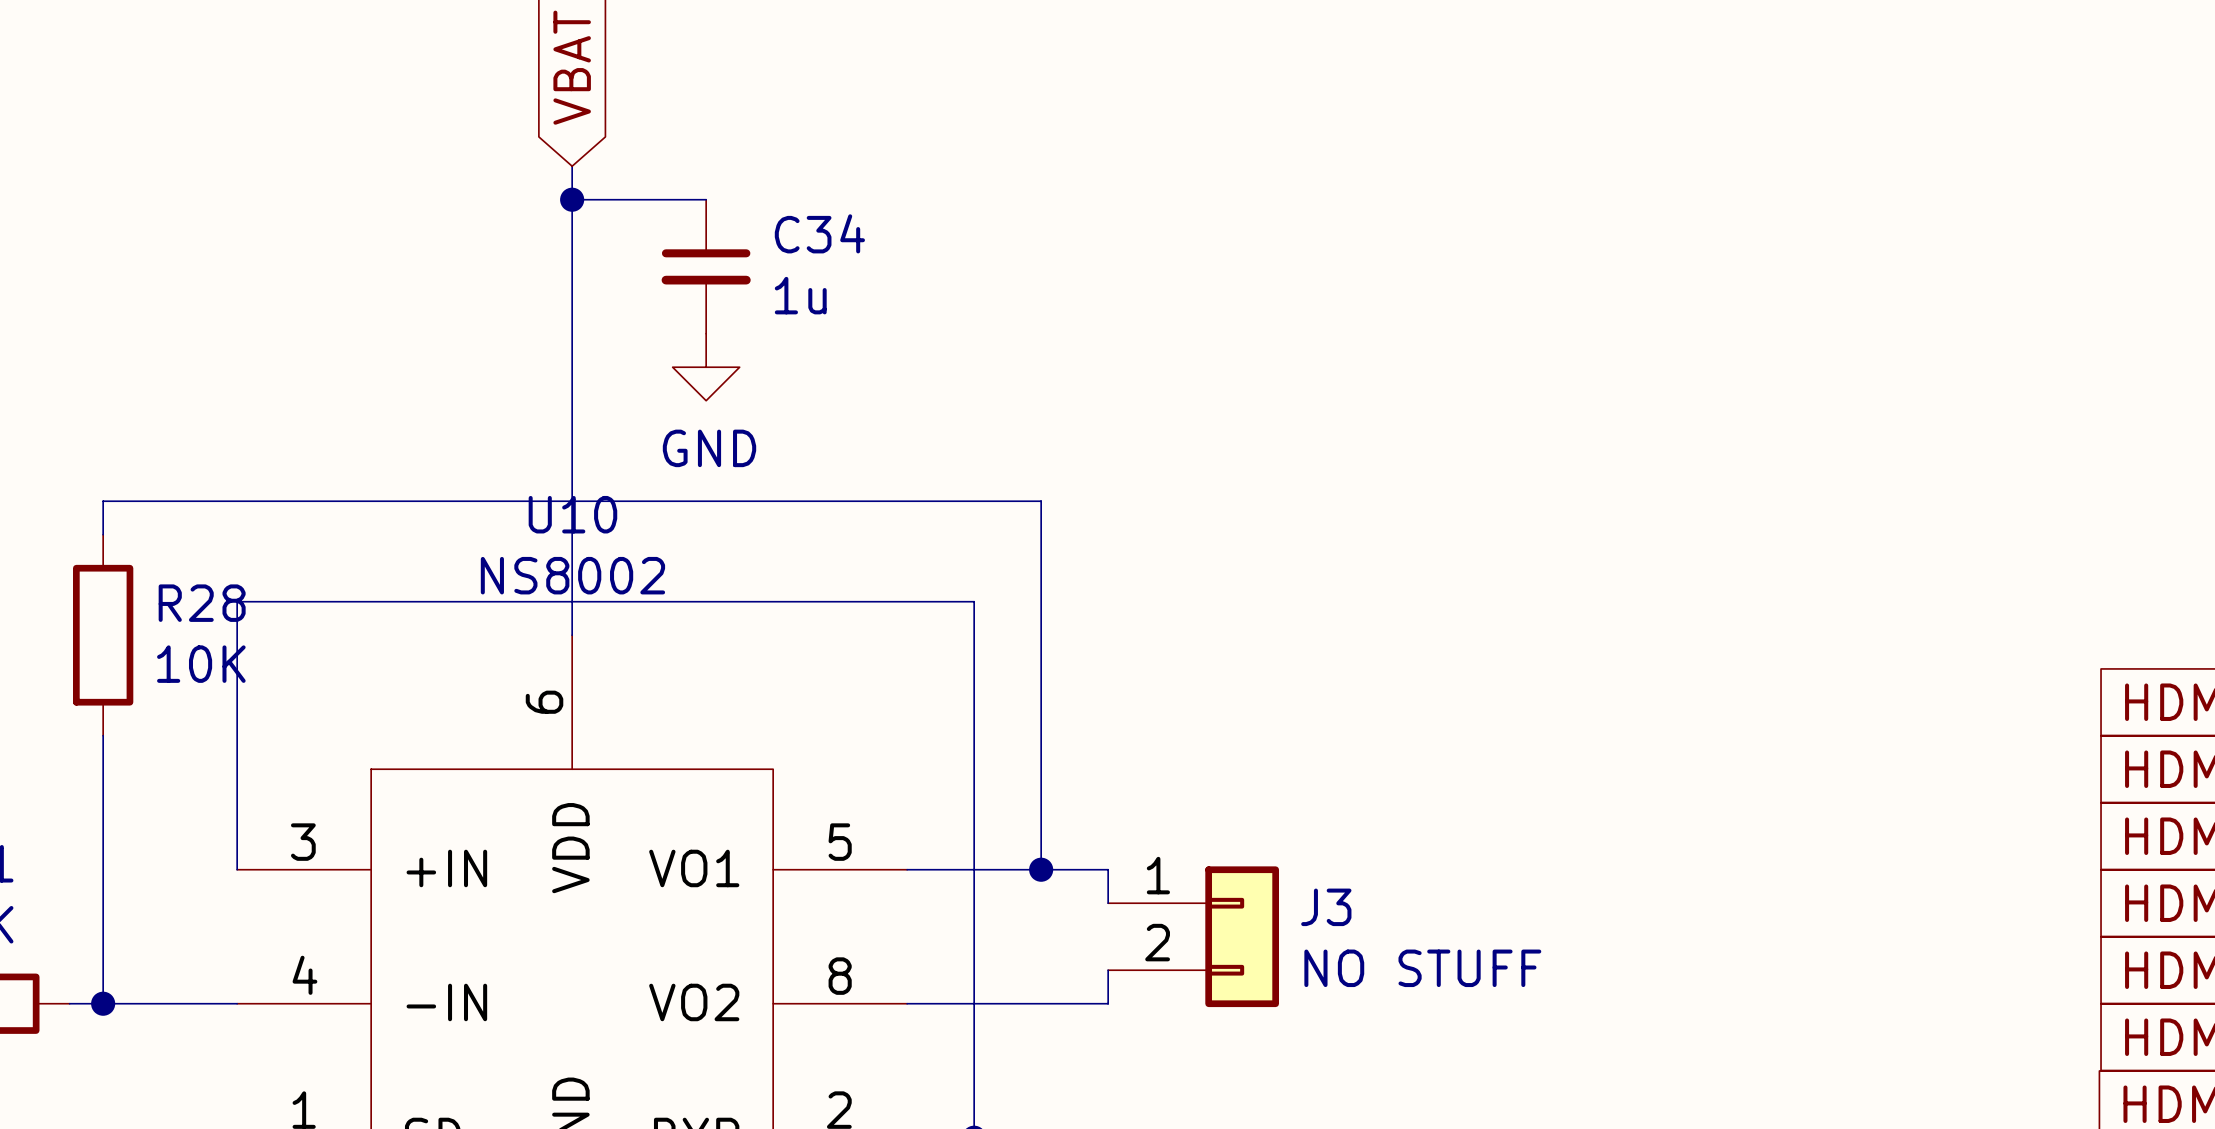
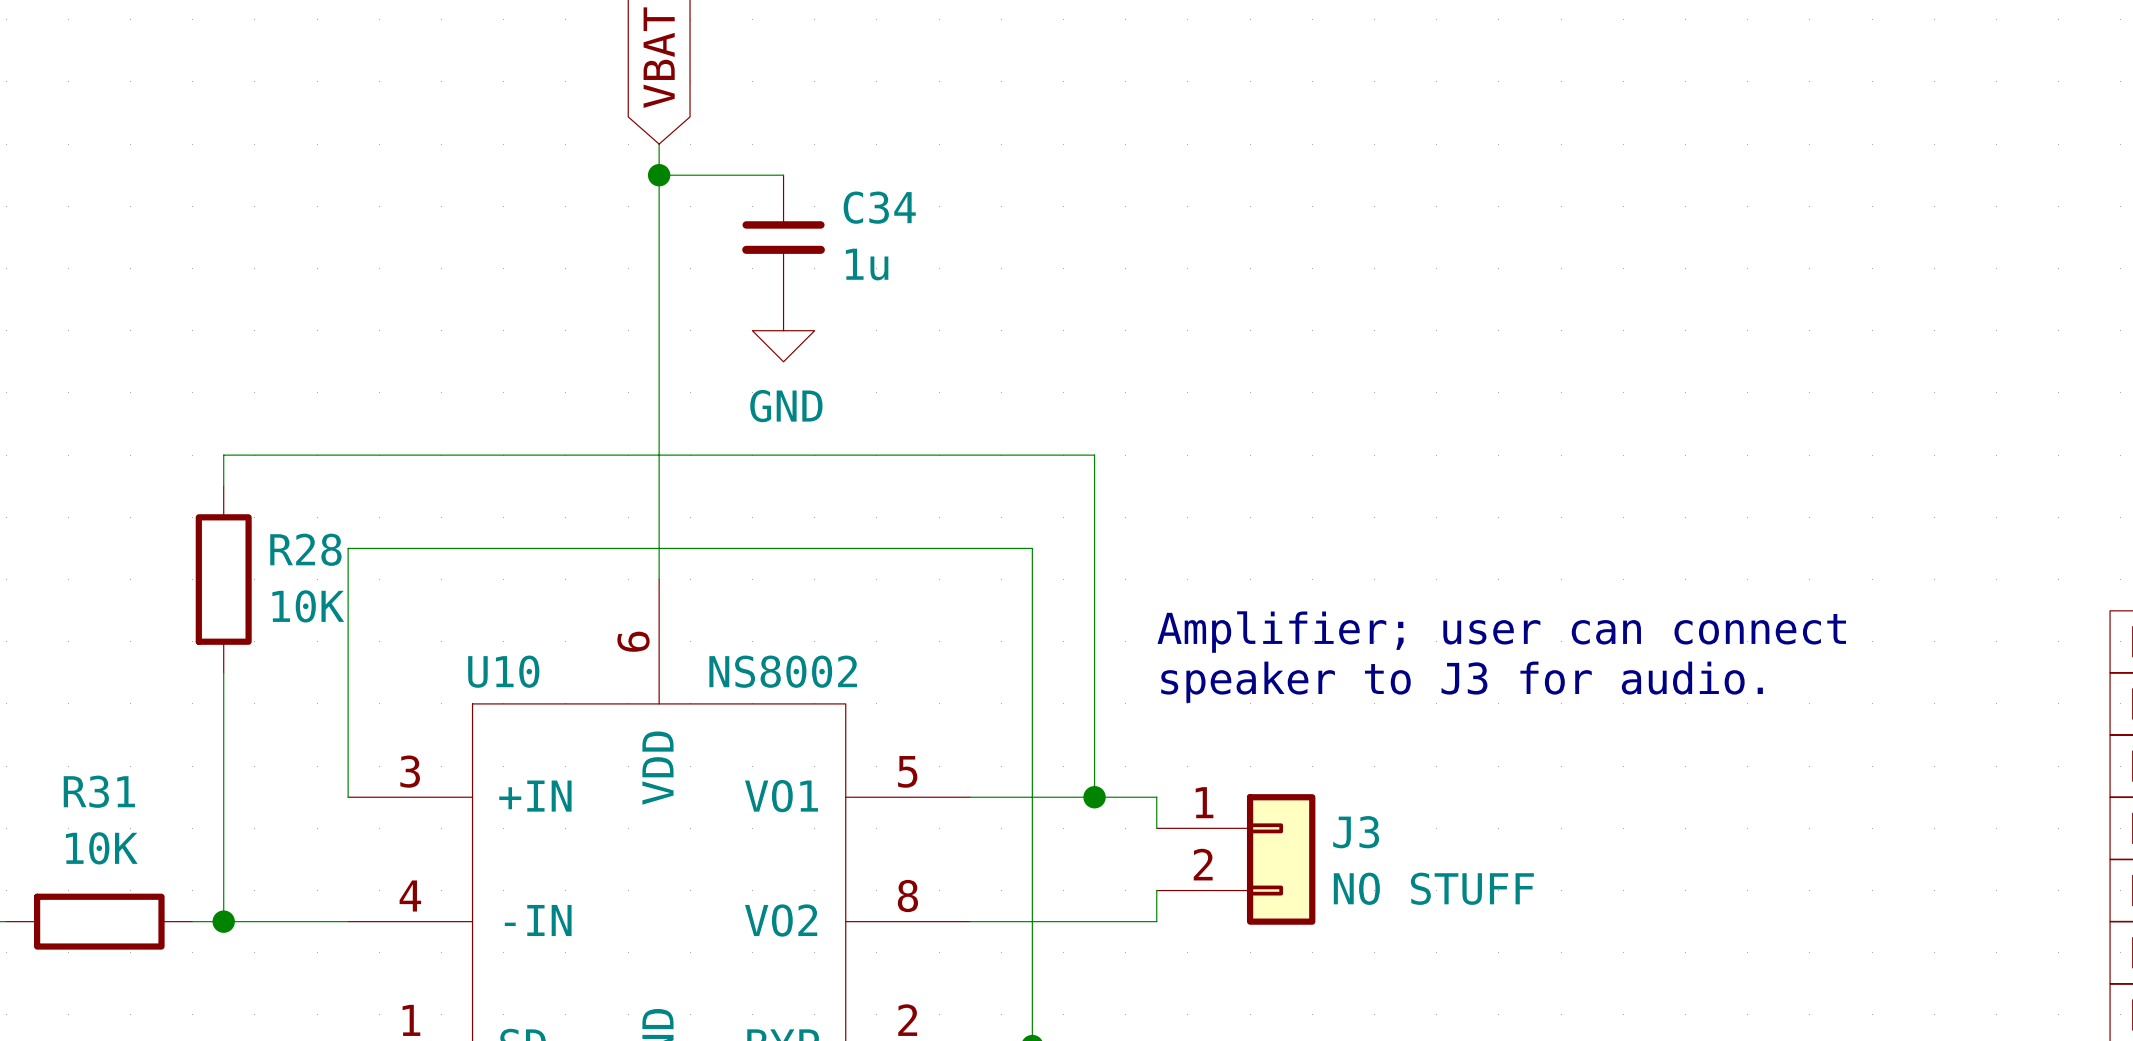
U10 name position: U10 (572, 514) -> U10 (503, 671)
U10 value position: NS8002 (572, 575) -> NS8002 (783, 671)
text: none -> Amplifier; user can connect (1501, 632)
text: none -> speaker to J3 for audio. (1462, 682)

